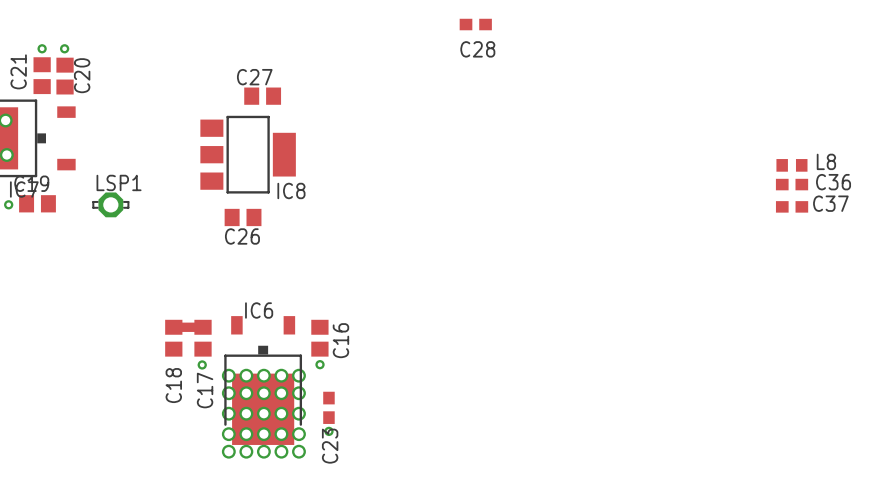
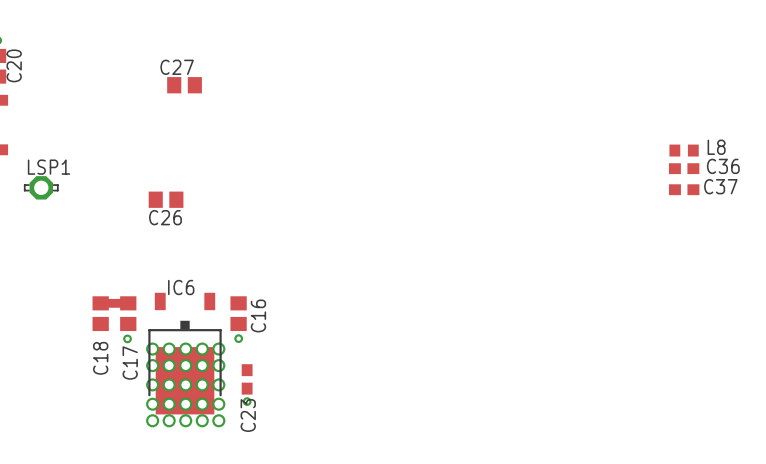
C28: (475, 24) -> none
IC8: (248, 154) -> none

